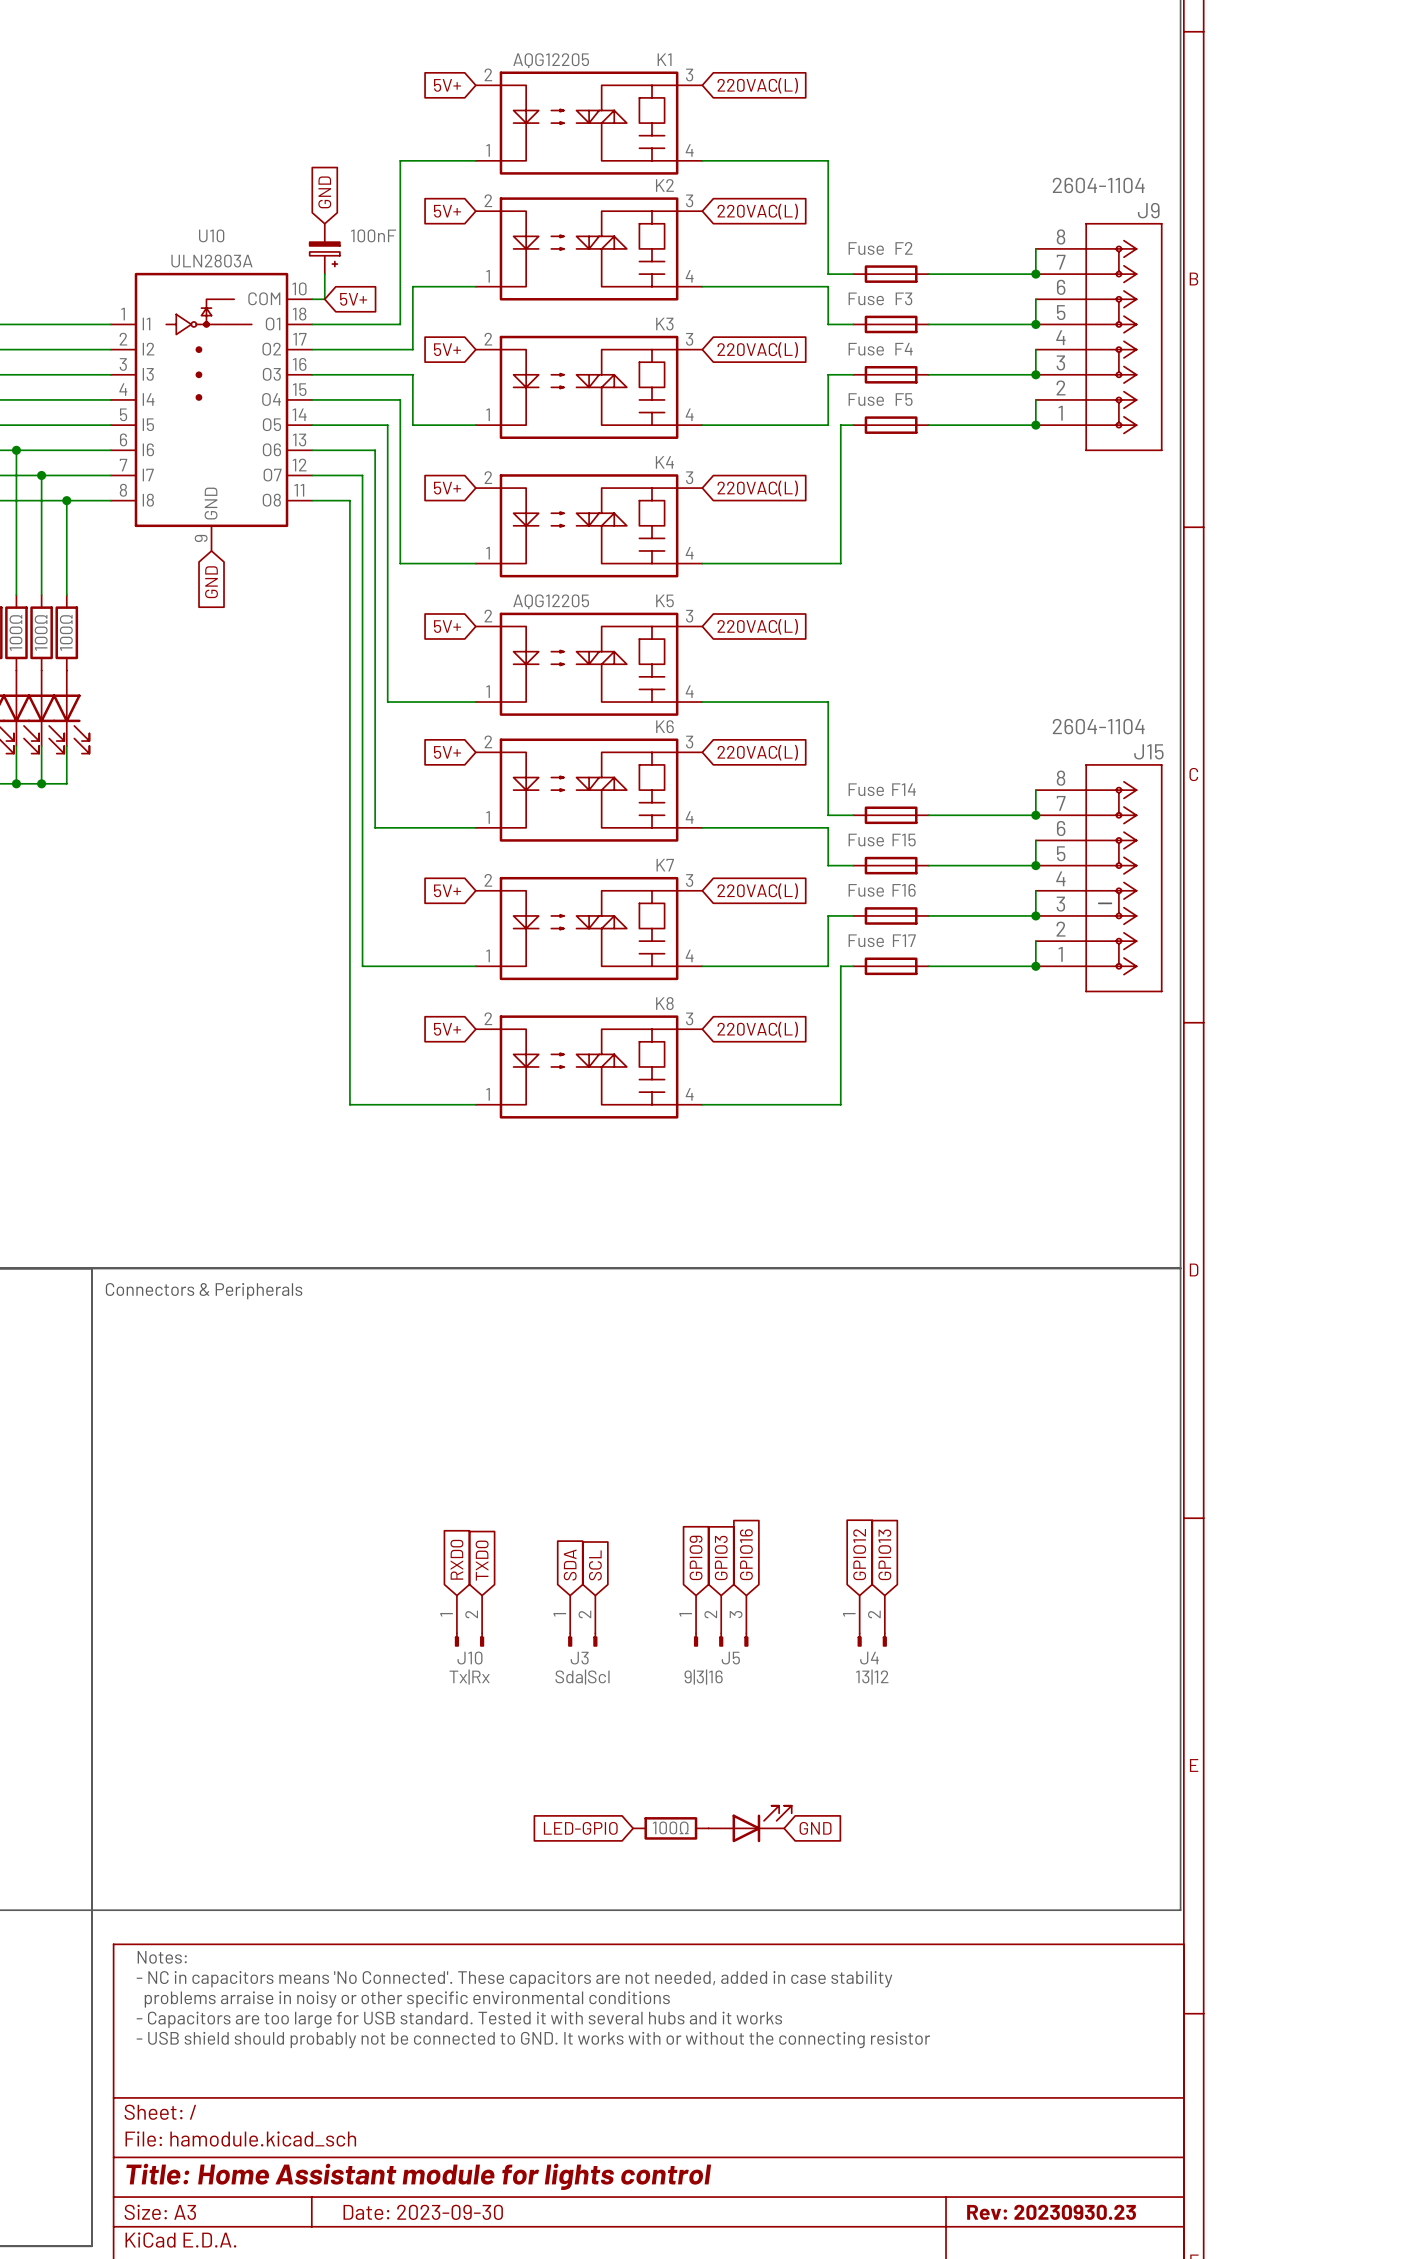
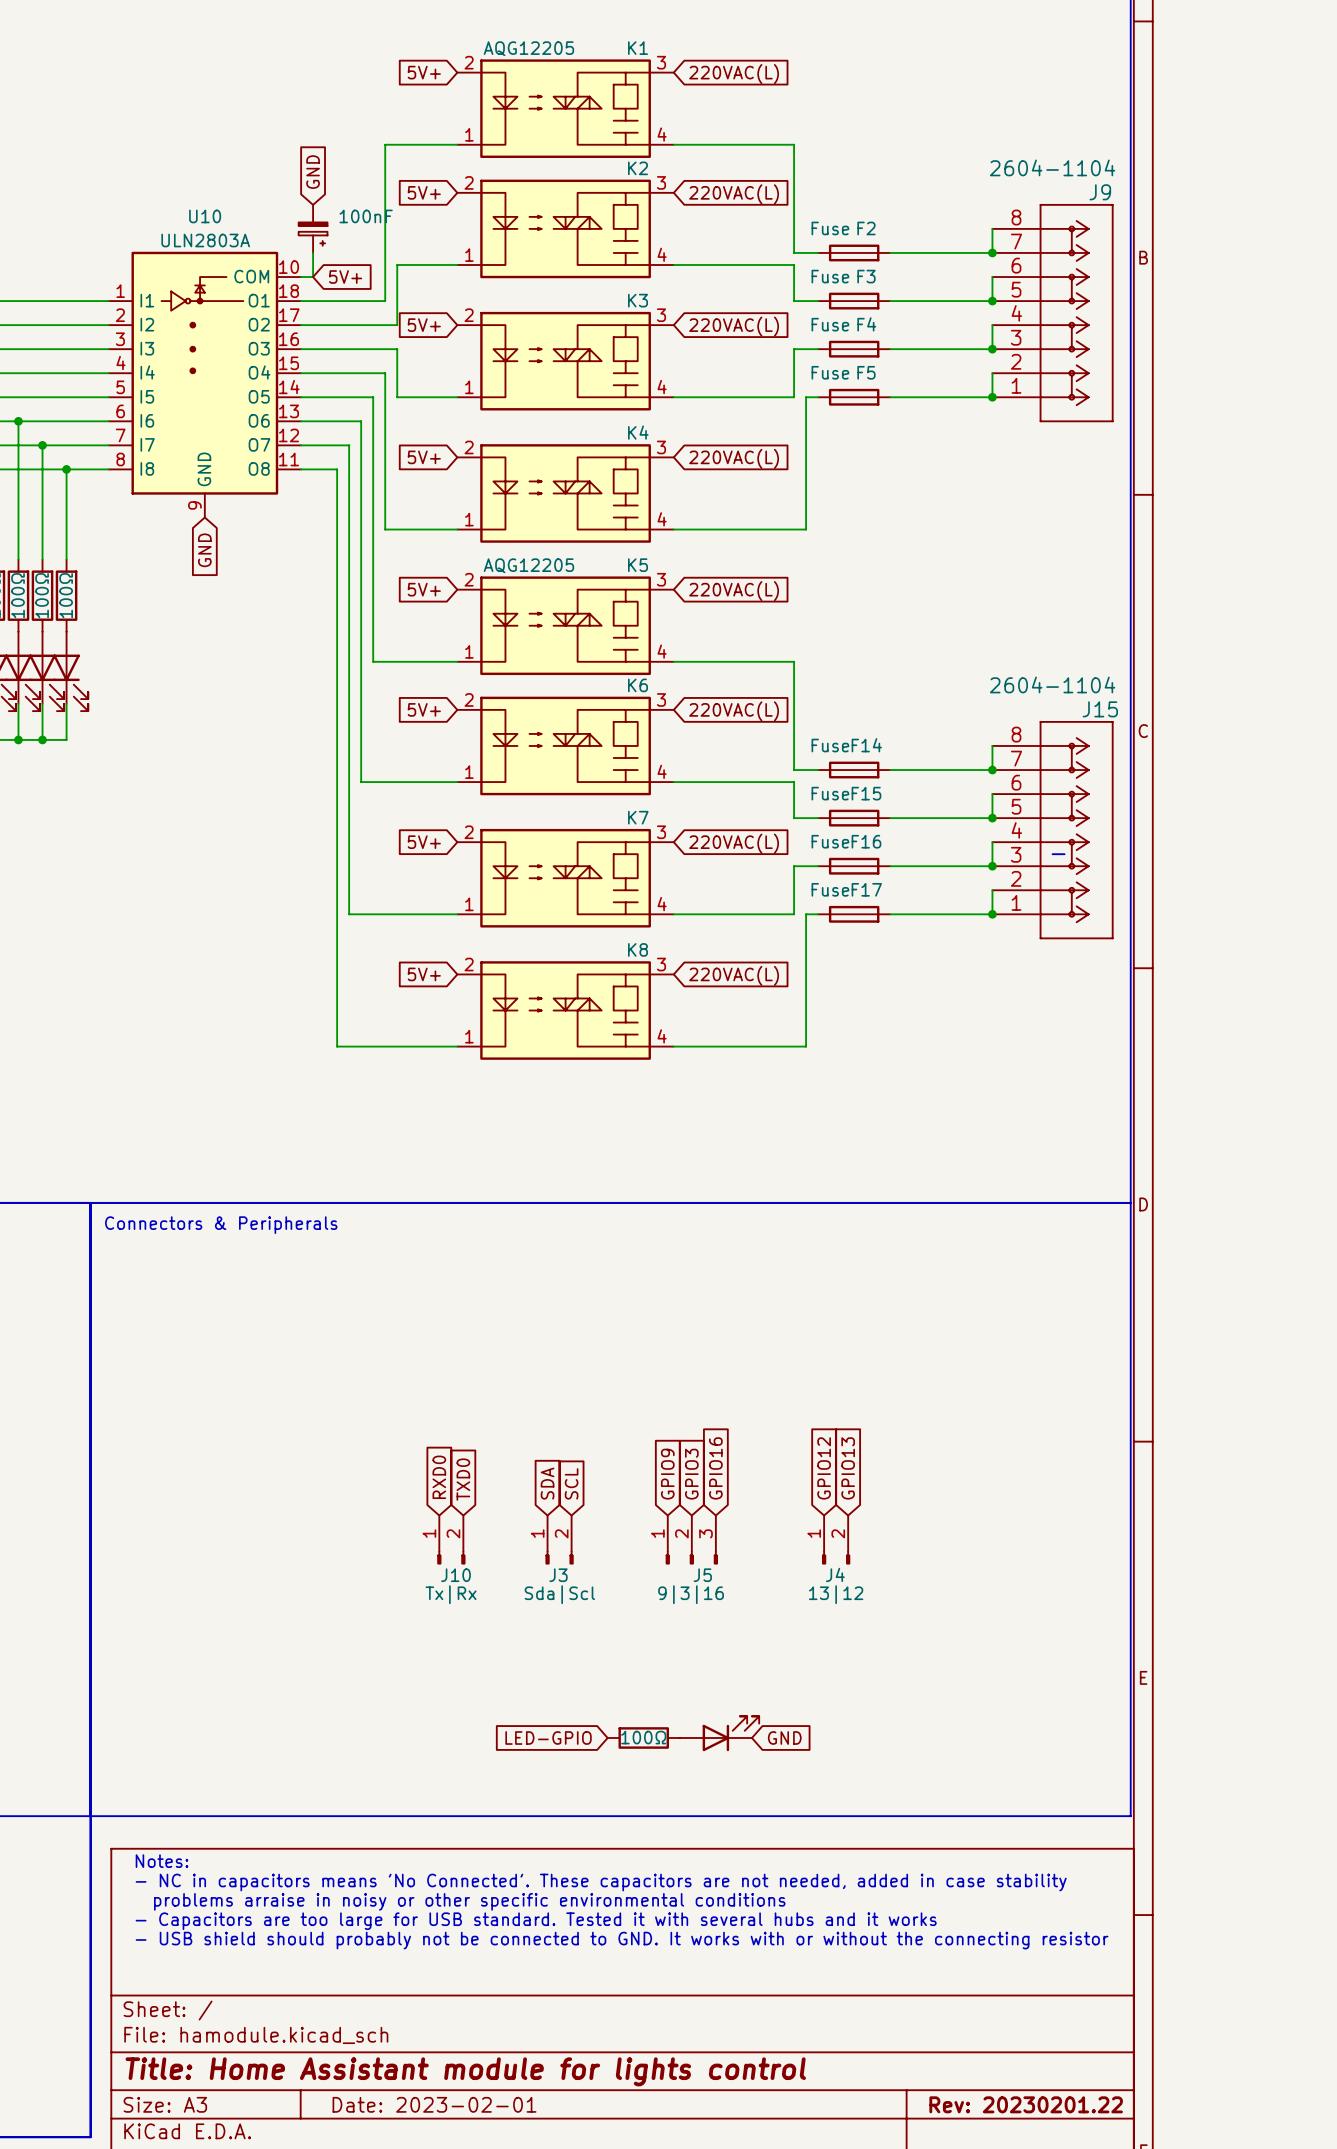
title block: Date: 2023-09-30 (423, 2212) -> Date: 2023-02-01 (434, 2104)
title block: Rev: 20230930.23 (1051, 2212) -> Rev: 20230201.22 (1026, 2104)

